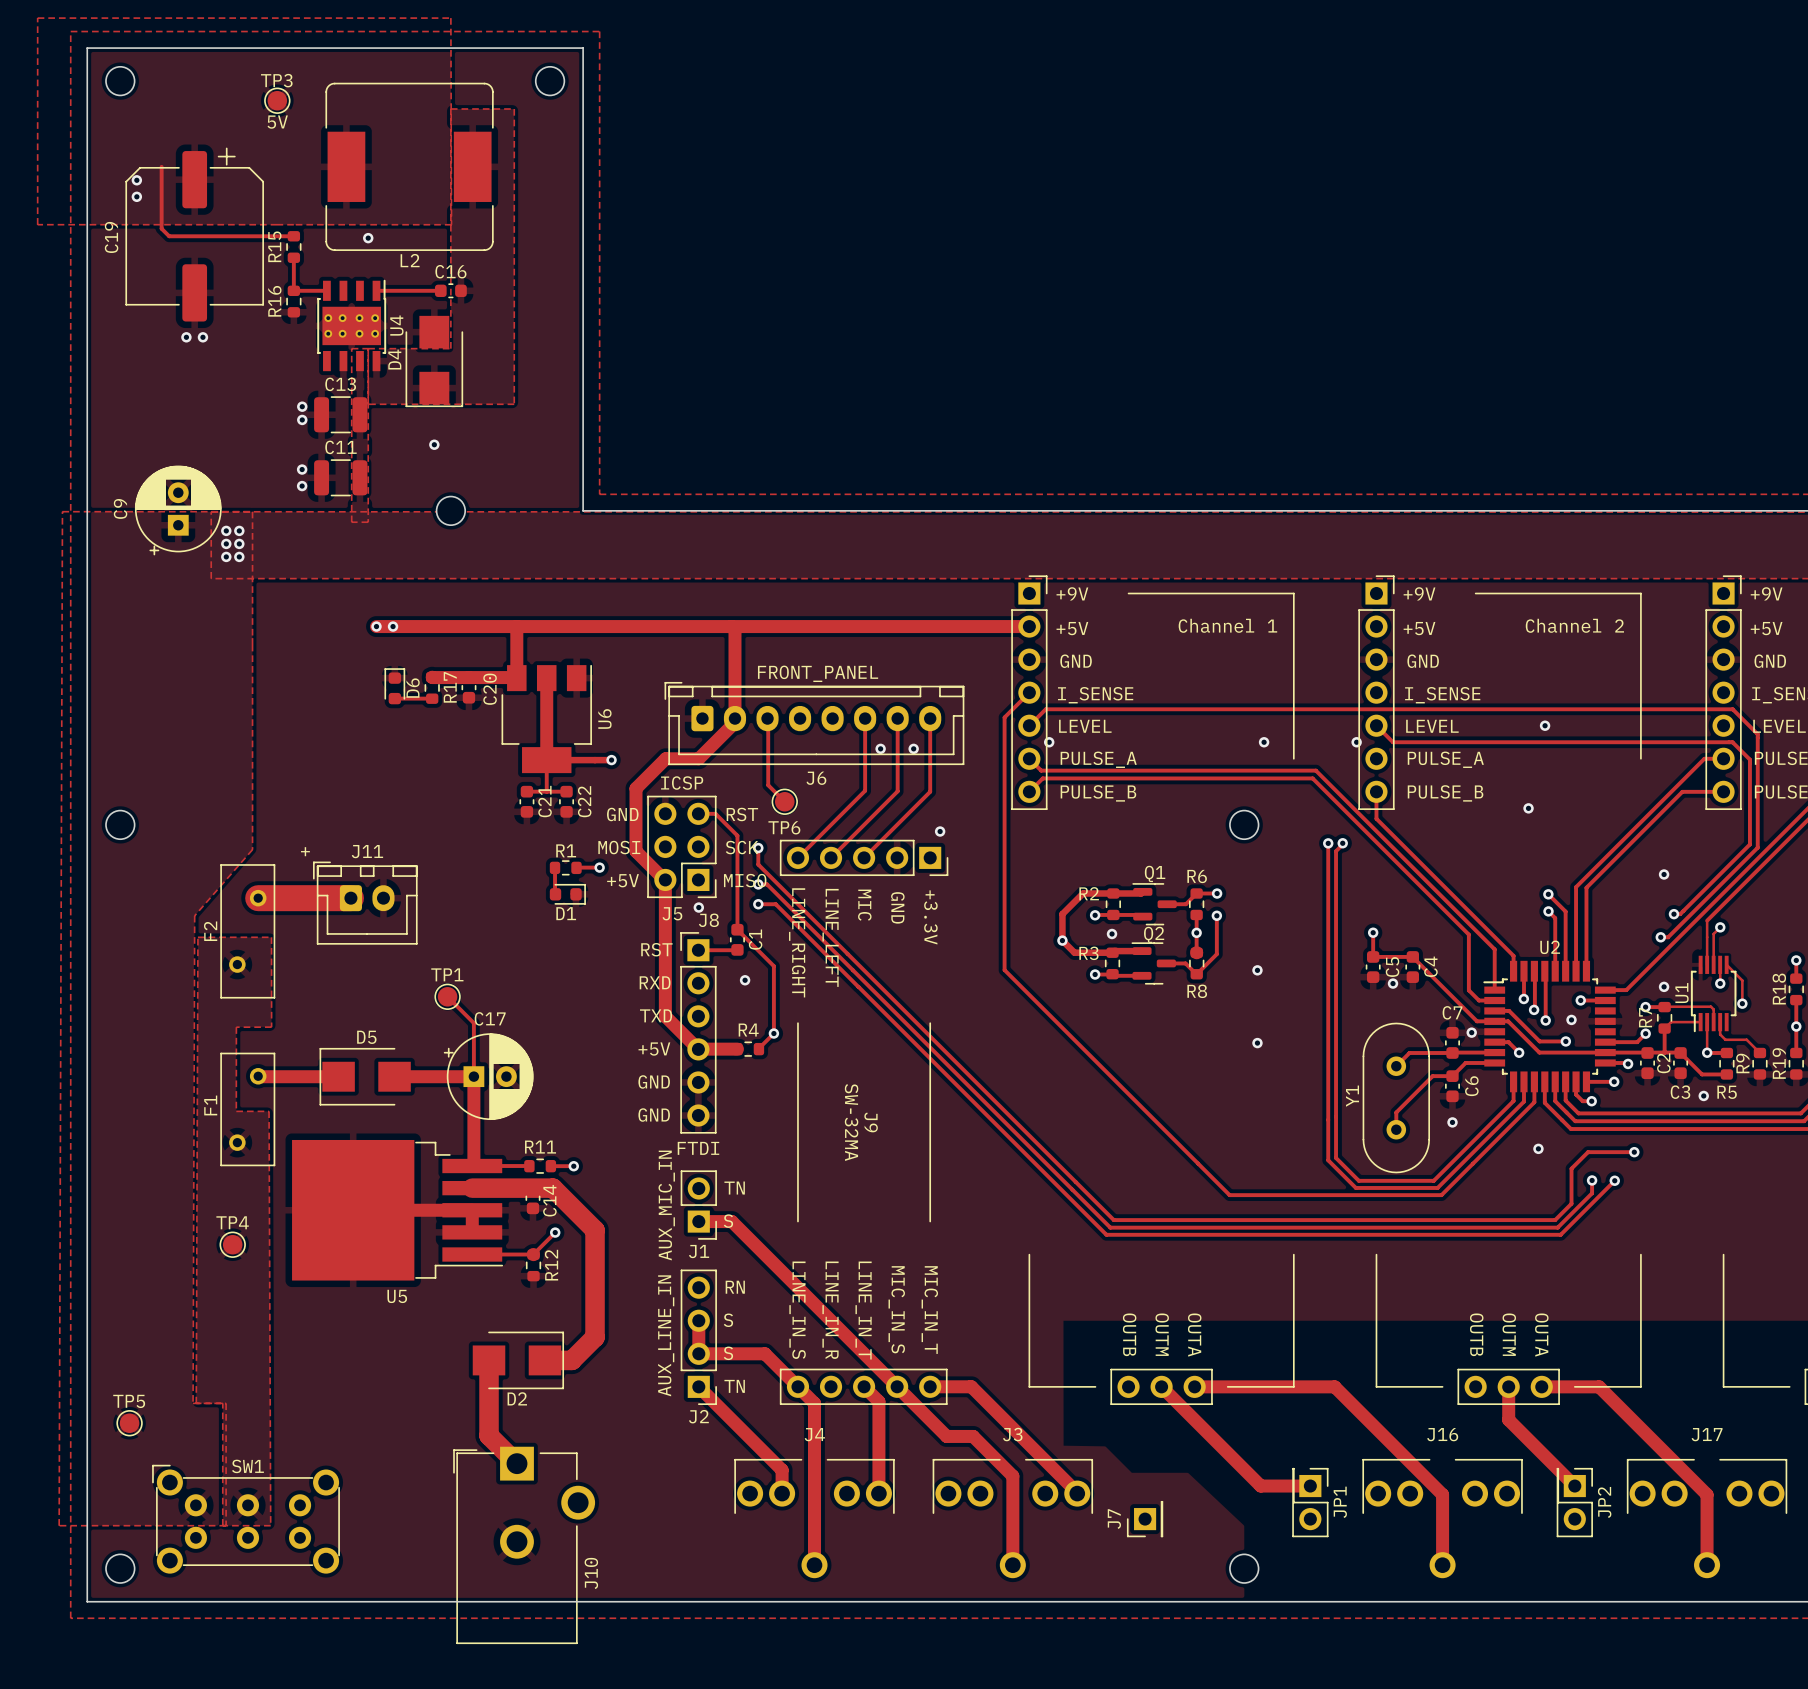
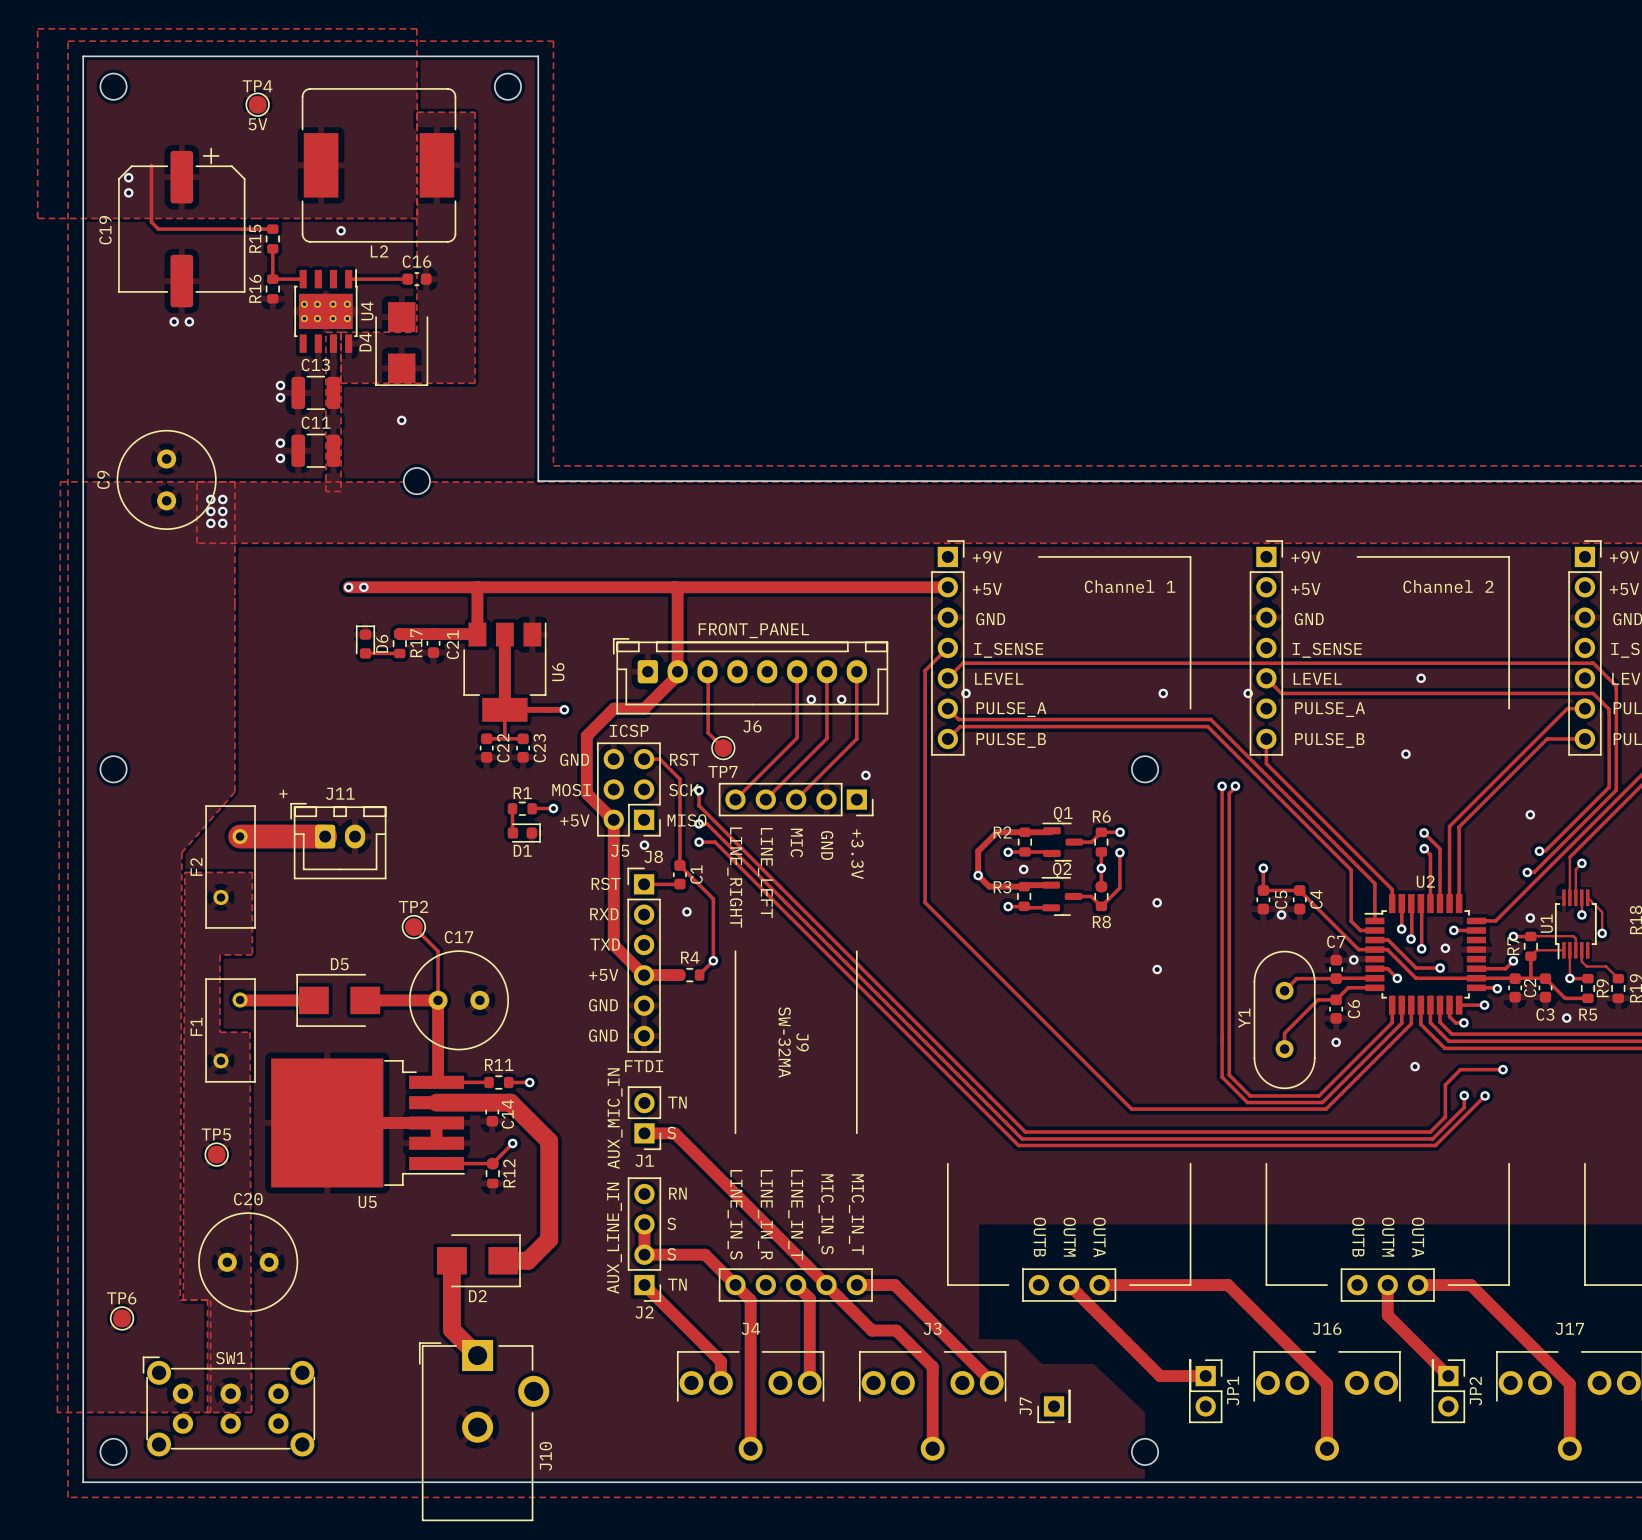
TP3 name: TP3 (276, 80) -> TP4 (257, 86)
C9 footprint: [134, 465, 222, 556] -> [116, 429, 217, 530]
C20 name: C20 (490, 689) -> C21 (452, 644)
C21 name: C21 (545, 801) -> C22 (503, 748)
C22 name: C22 (584, 801) -> C23 (539, 748)
TP6 name: TP6 (784, 827) -> TP7 (722, 771)
TP1 name: TP1 (447, 974) -> TP2 (413, 906)
C17 footprint: [443, 1033, 534, 1120] -> [409, 950, 509, 1051]
TP4 name: TP4 (232, 1222) -> TP5 (216, 1134)
C20: none -> (248, 1262)
TP5 name: TP5 (129, 1401) -> TP6 (121, 1298)

